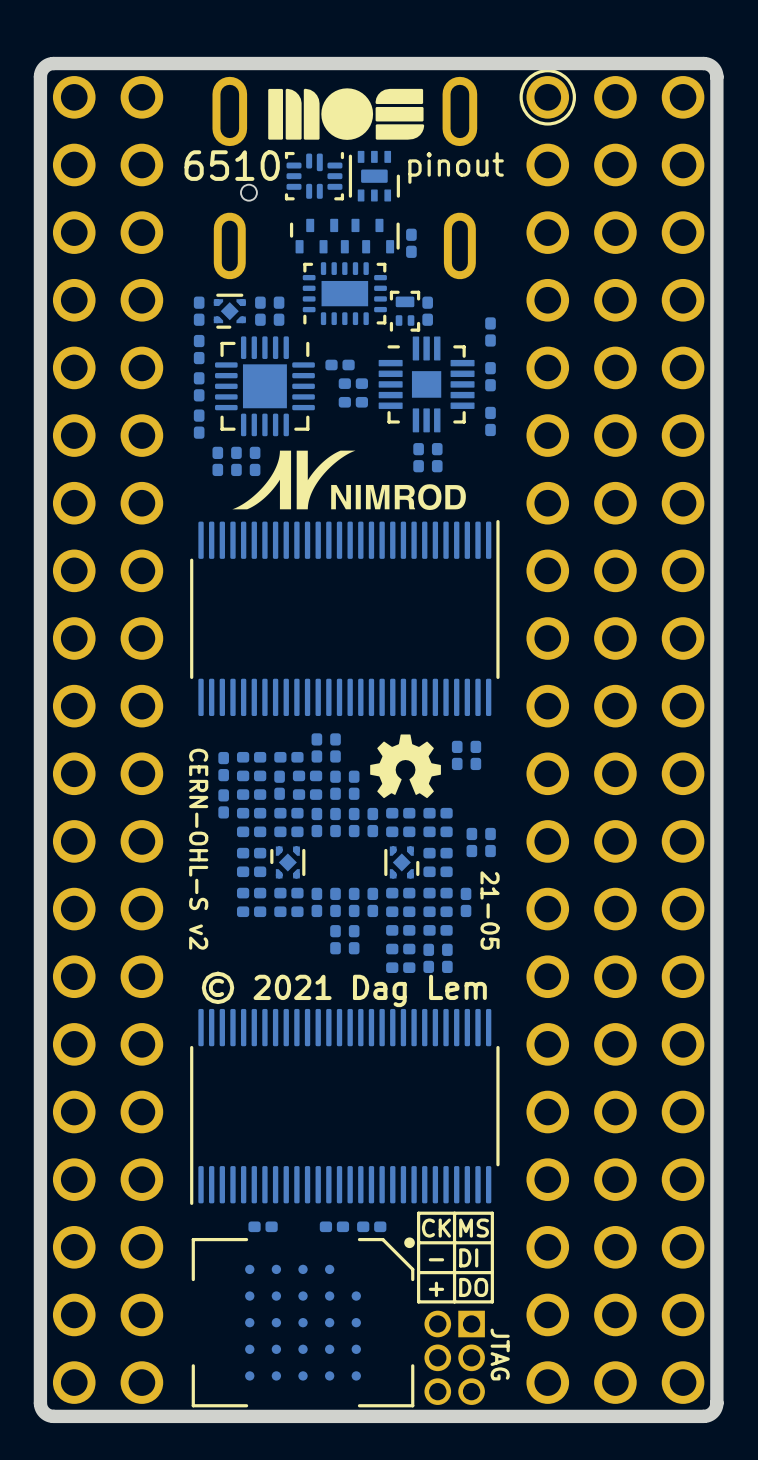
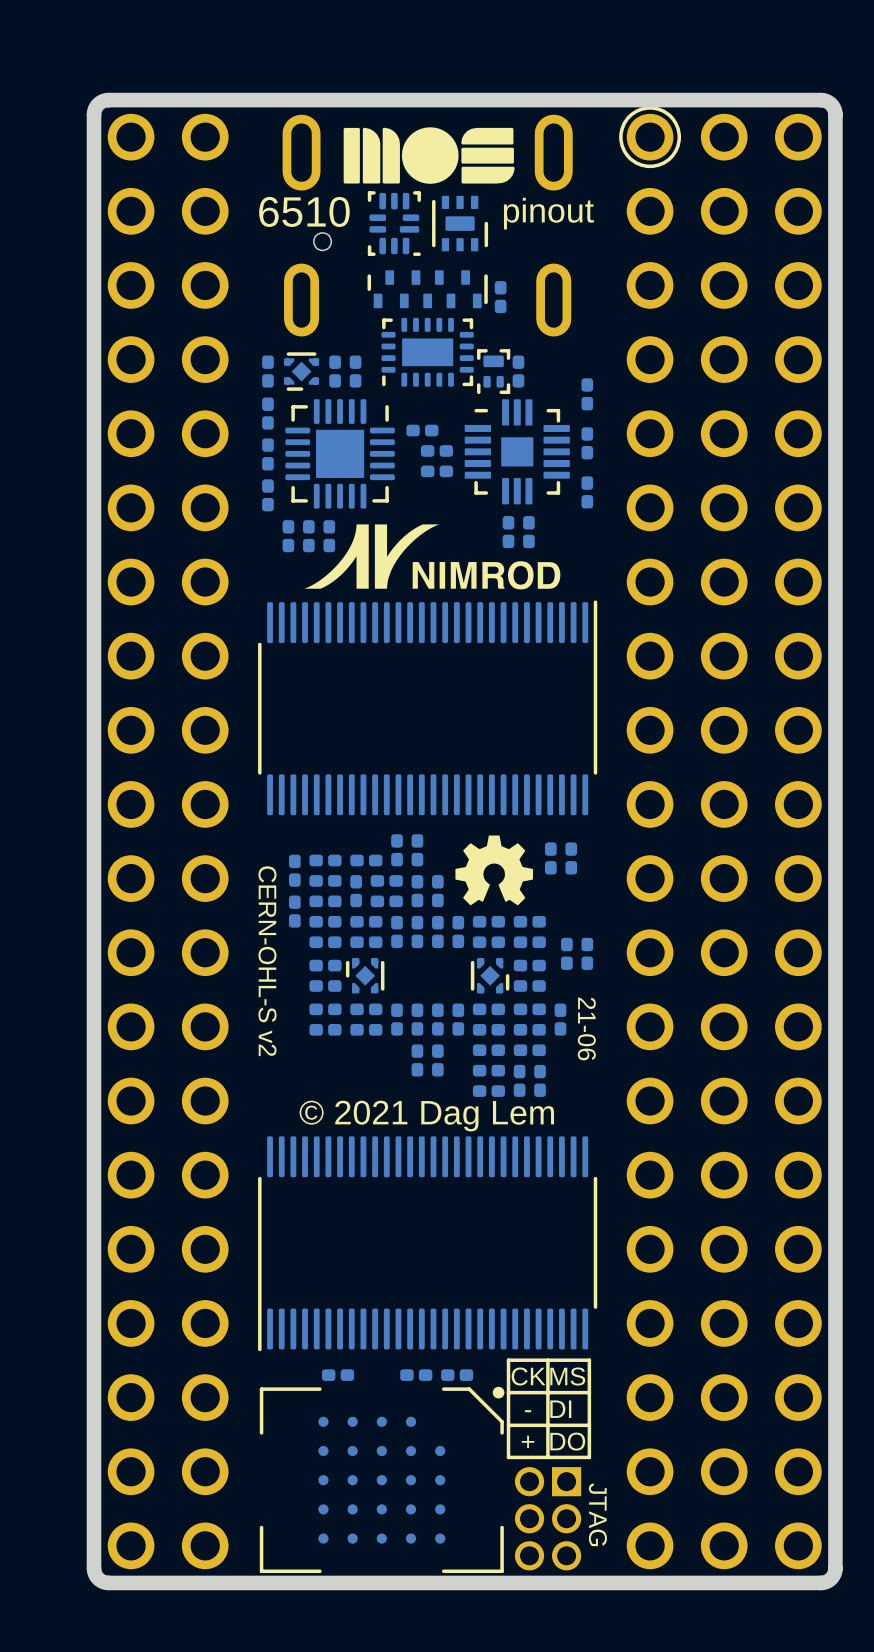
part rotation: 0° (314, 176) -> 90° clockwise (394, 223)
text: 21-05 (490, 910) -> 21-06 (586, 1029)

